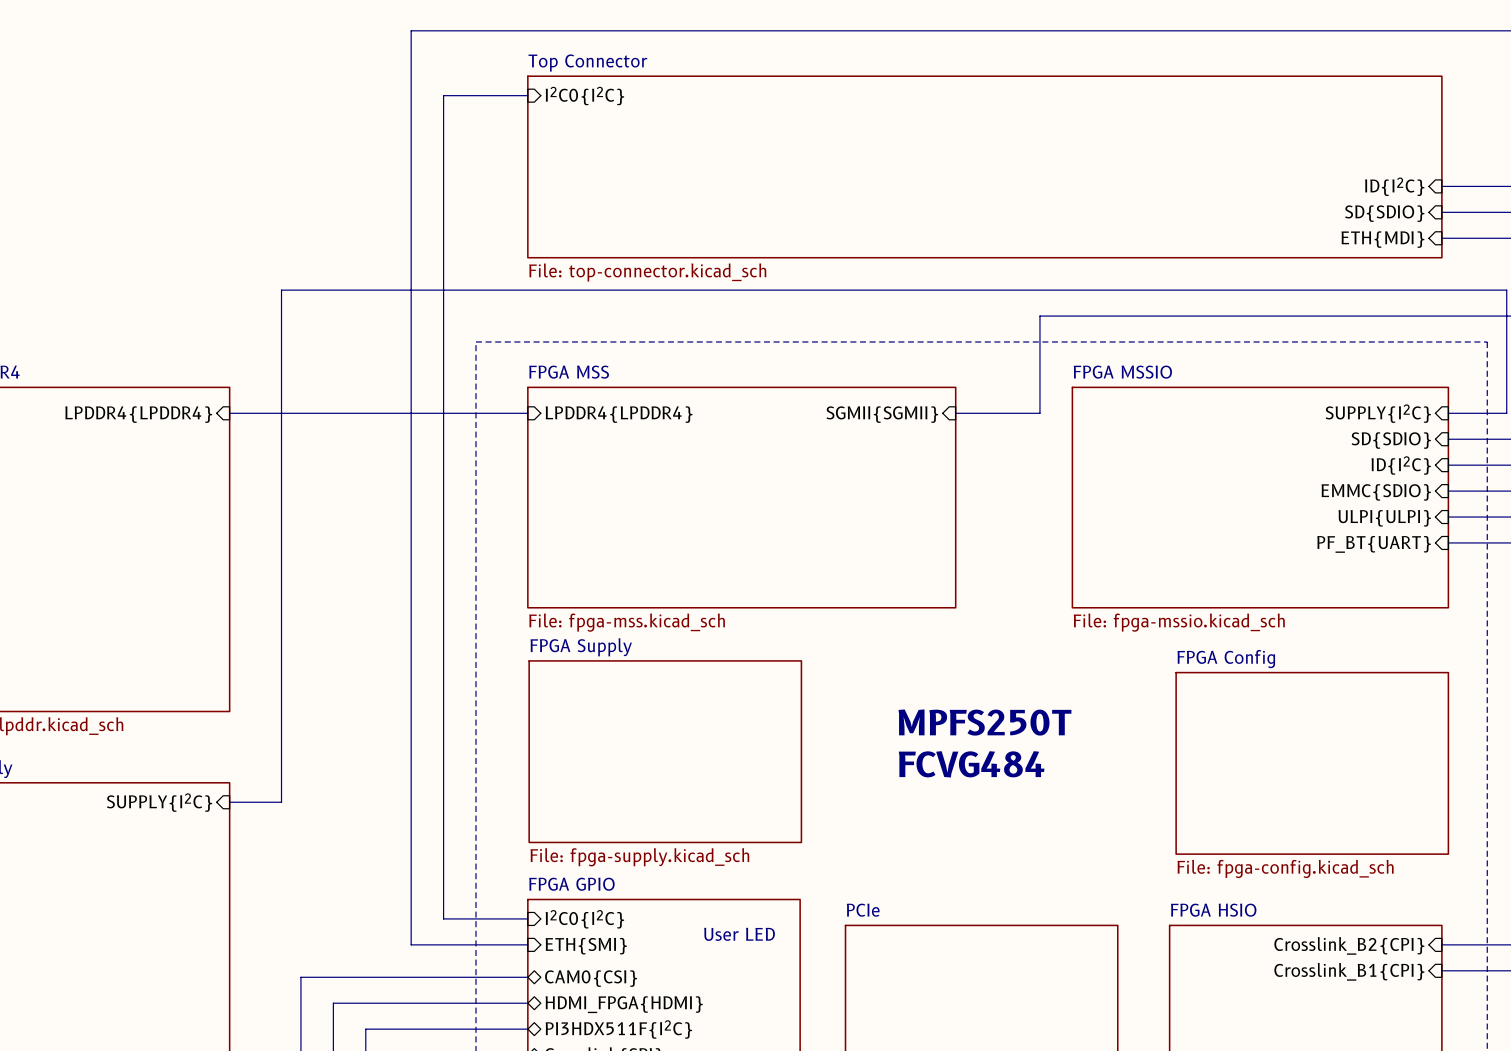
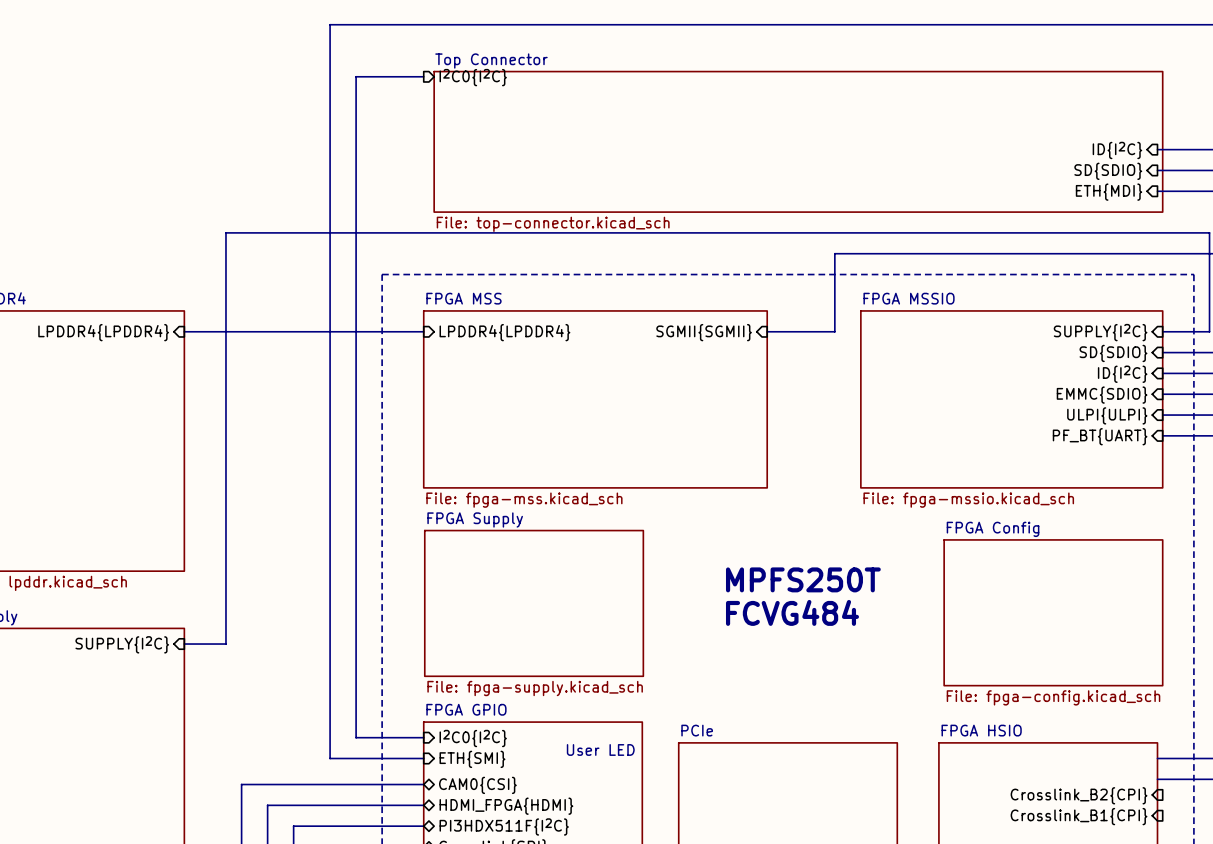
sheet Top Connector: File: top-connector.kicad_sch (984, 166) -> none
sheet Top Connector: none -> File: top-connector.kicad_sch (798, 141)
sheet pin position: Crosslink_B2{CPI} (1349, 945) -> Crosslink_B2{CPI} (1079, 795)
sheet pin position: Crosslink_B1{CPI} (1349, 971) -> Crosslink_B1{CPI} (1079, 816)

